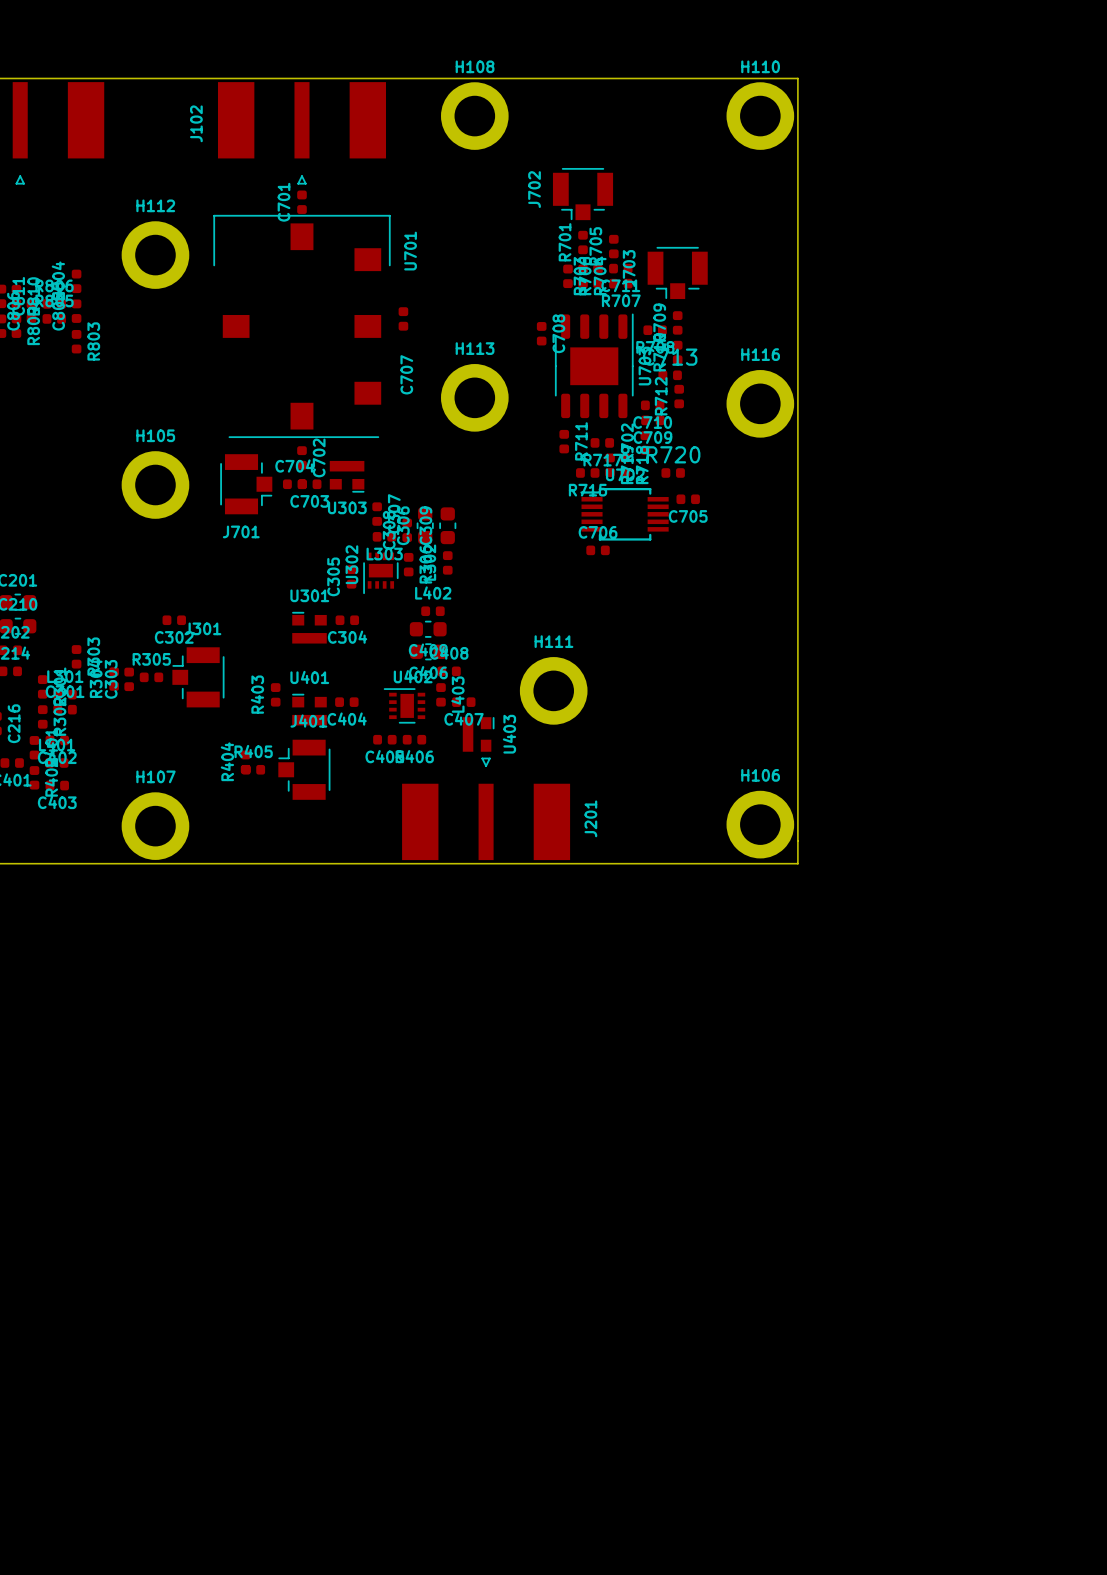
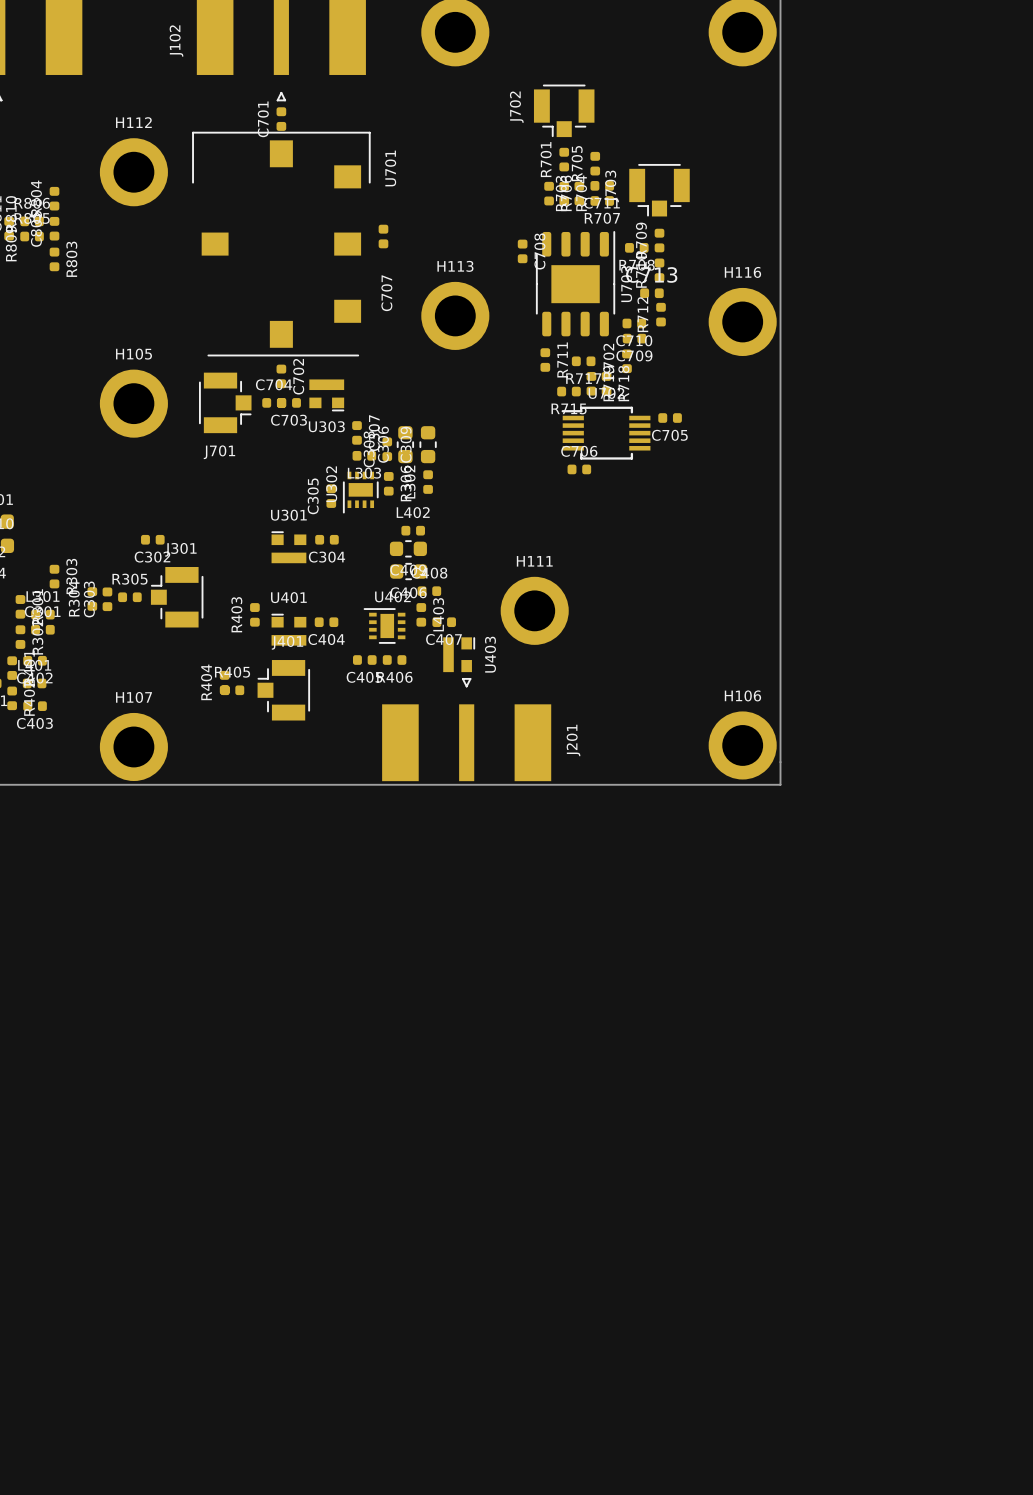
R720: (673, 472) -> none

